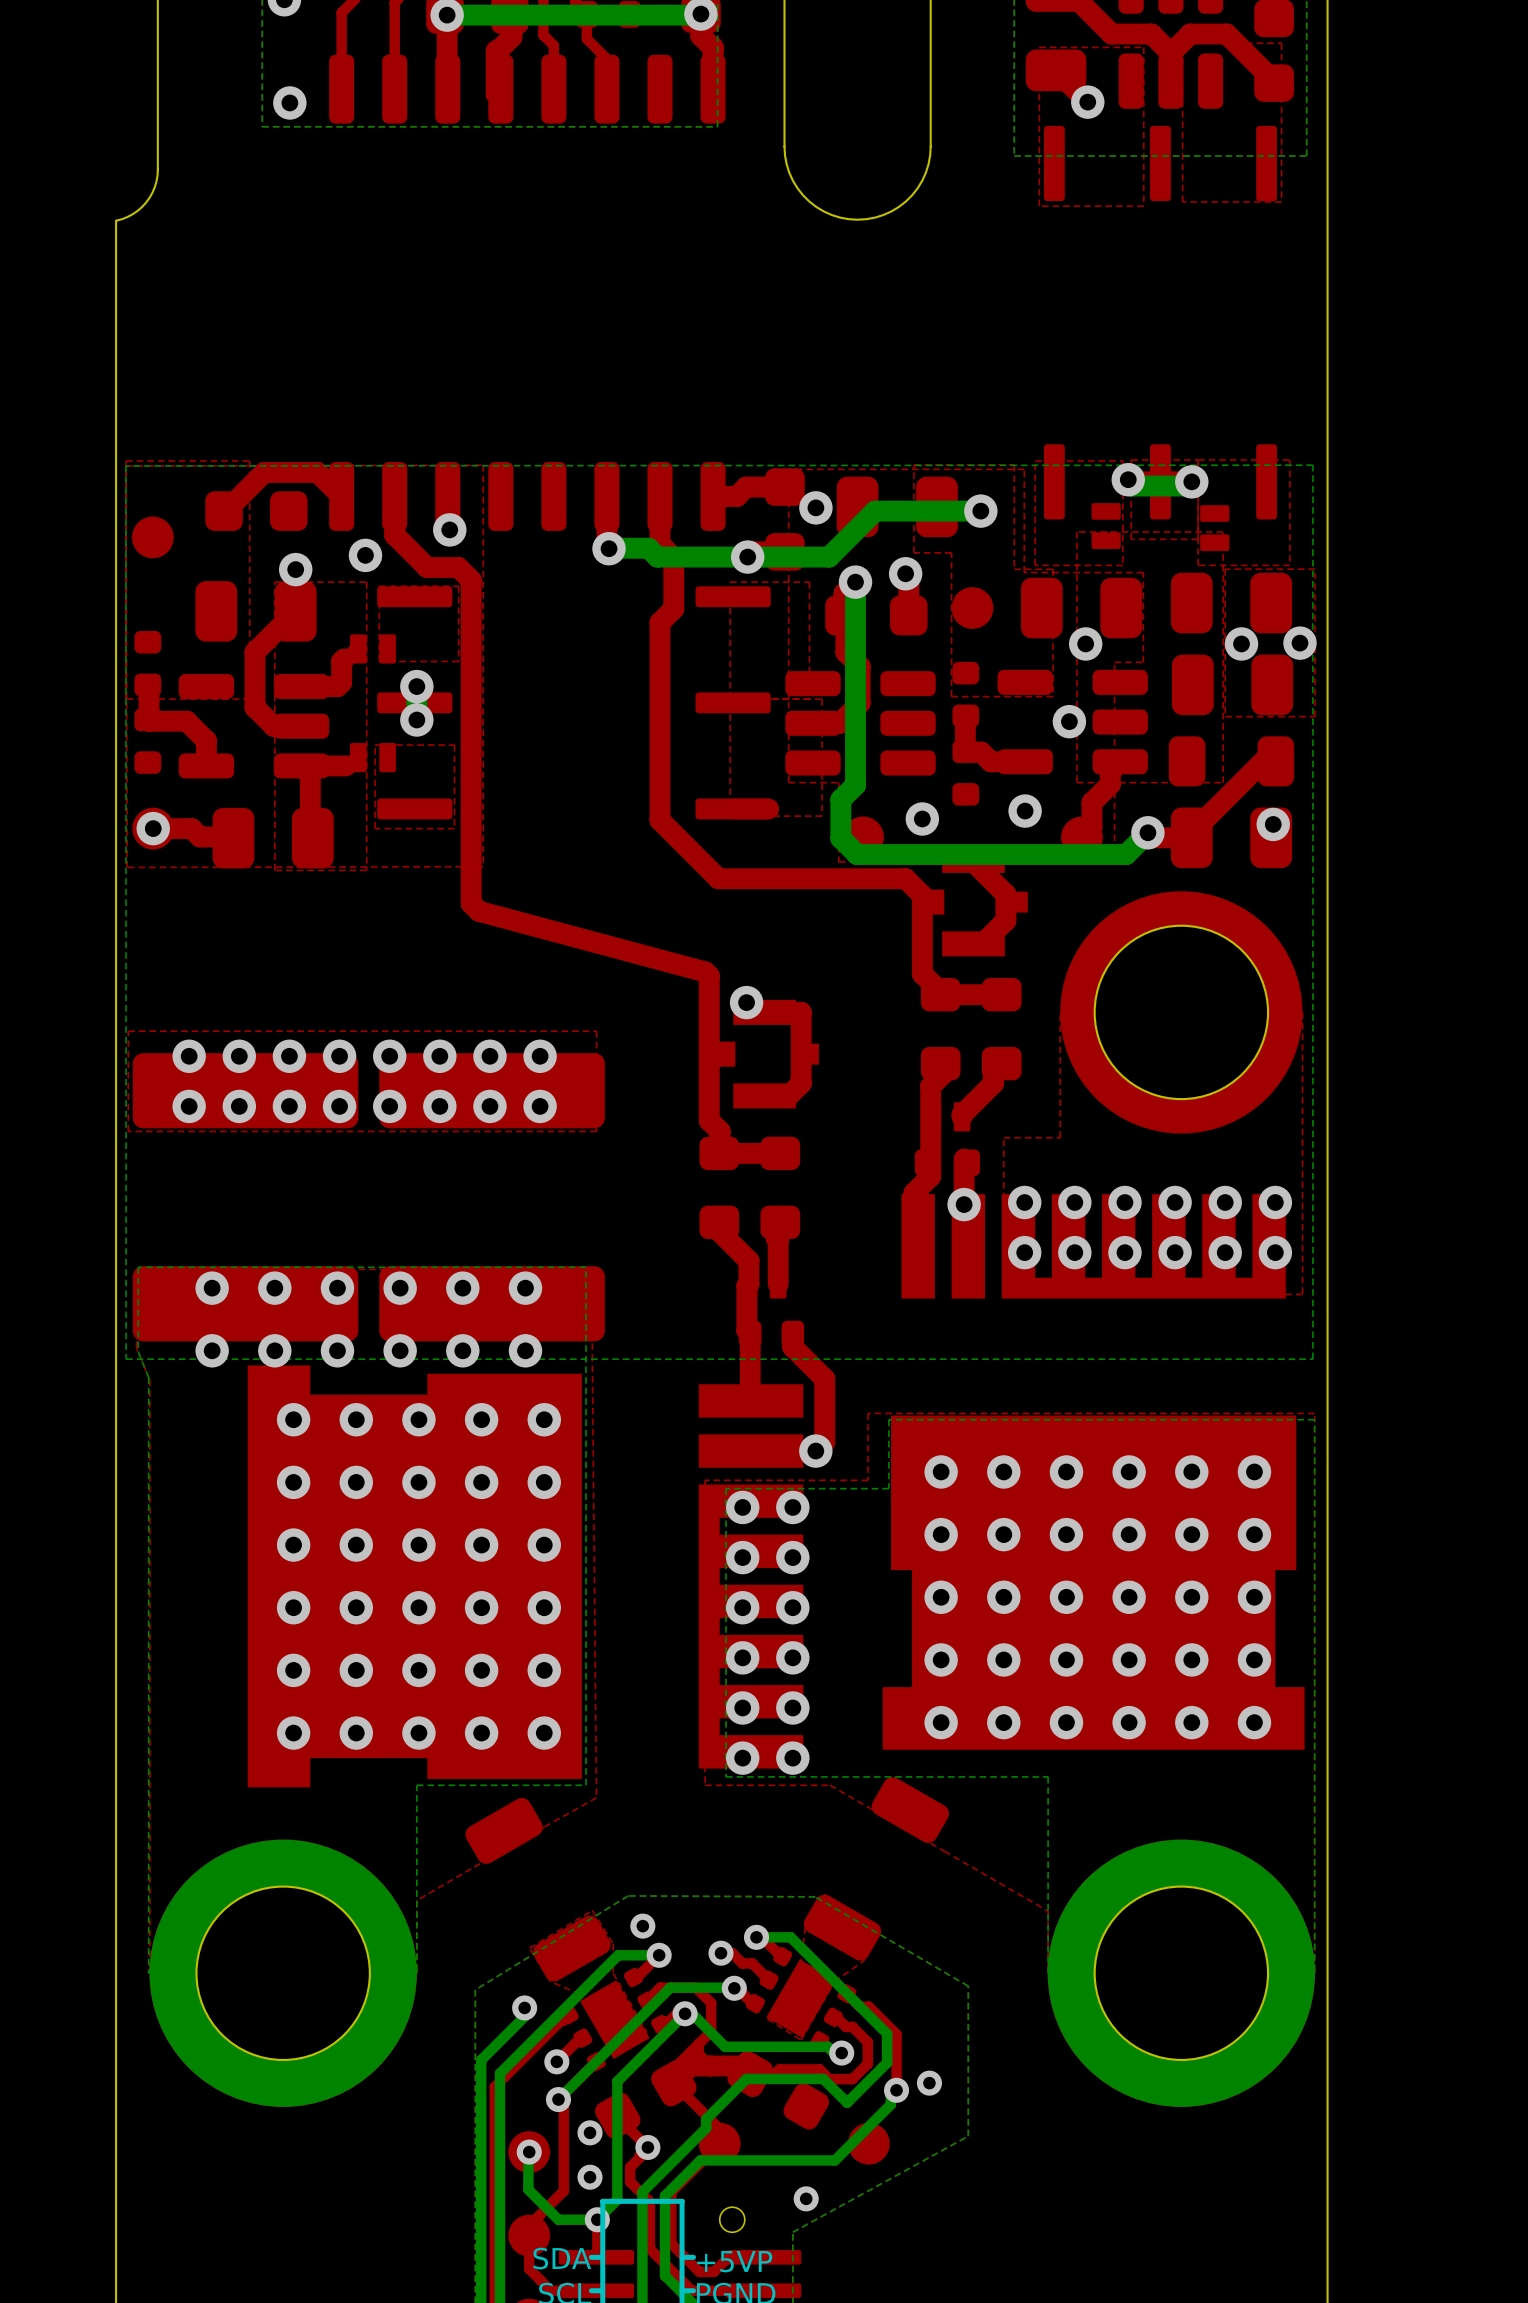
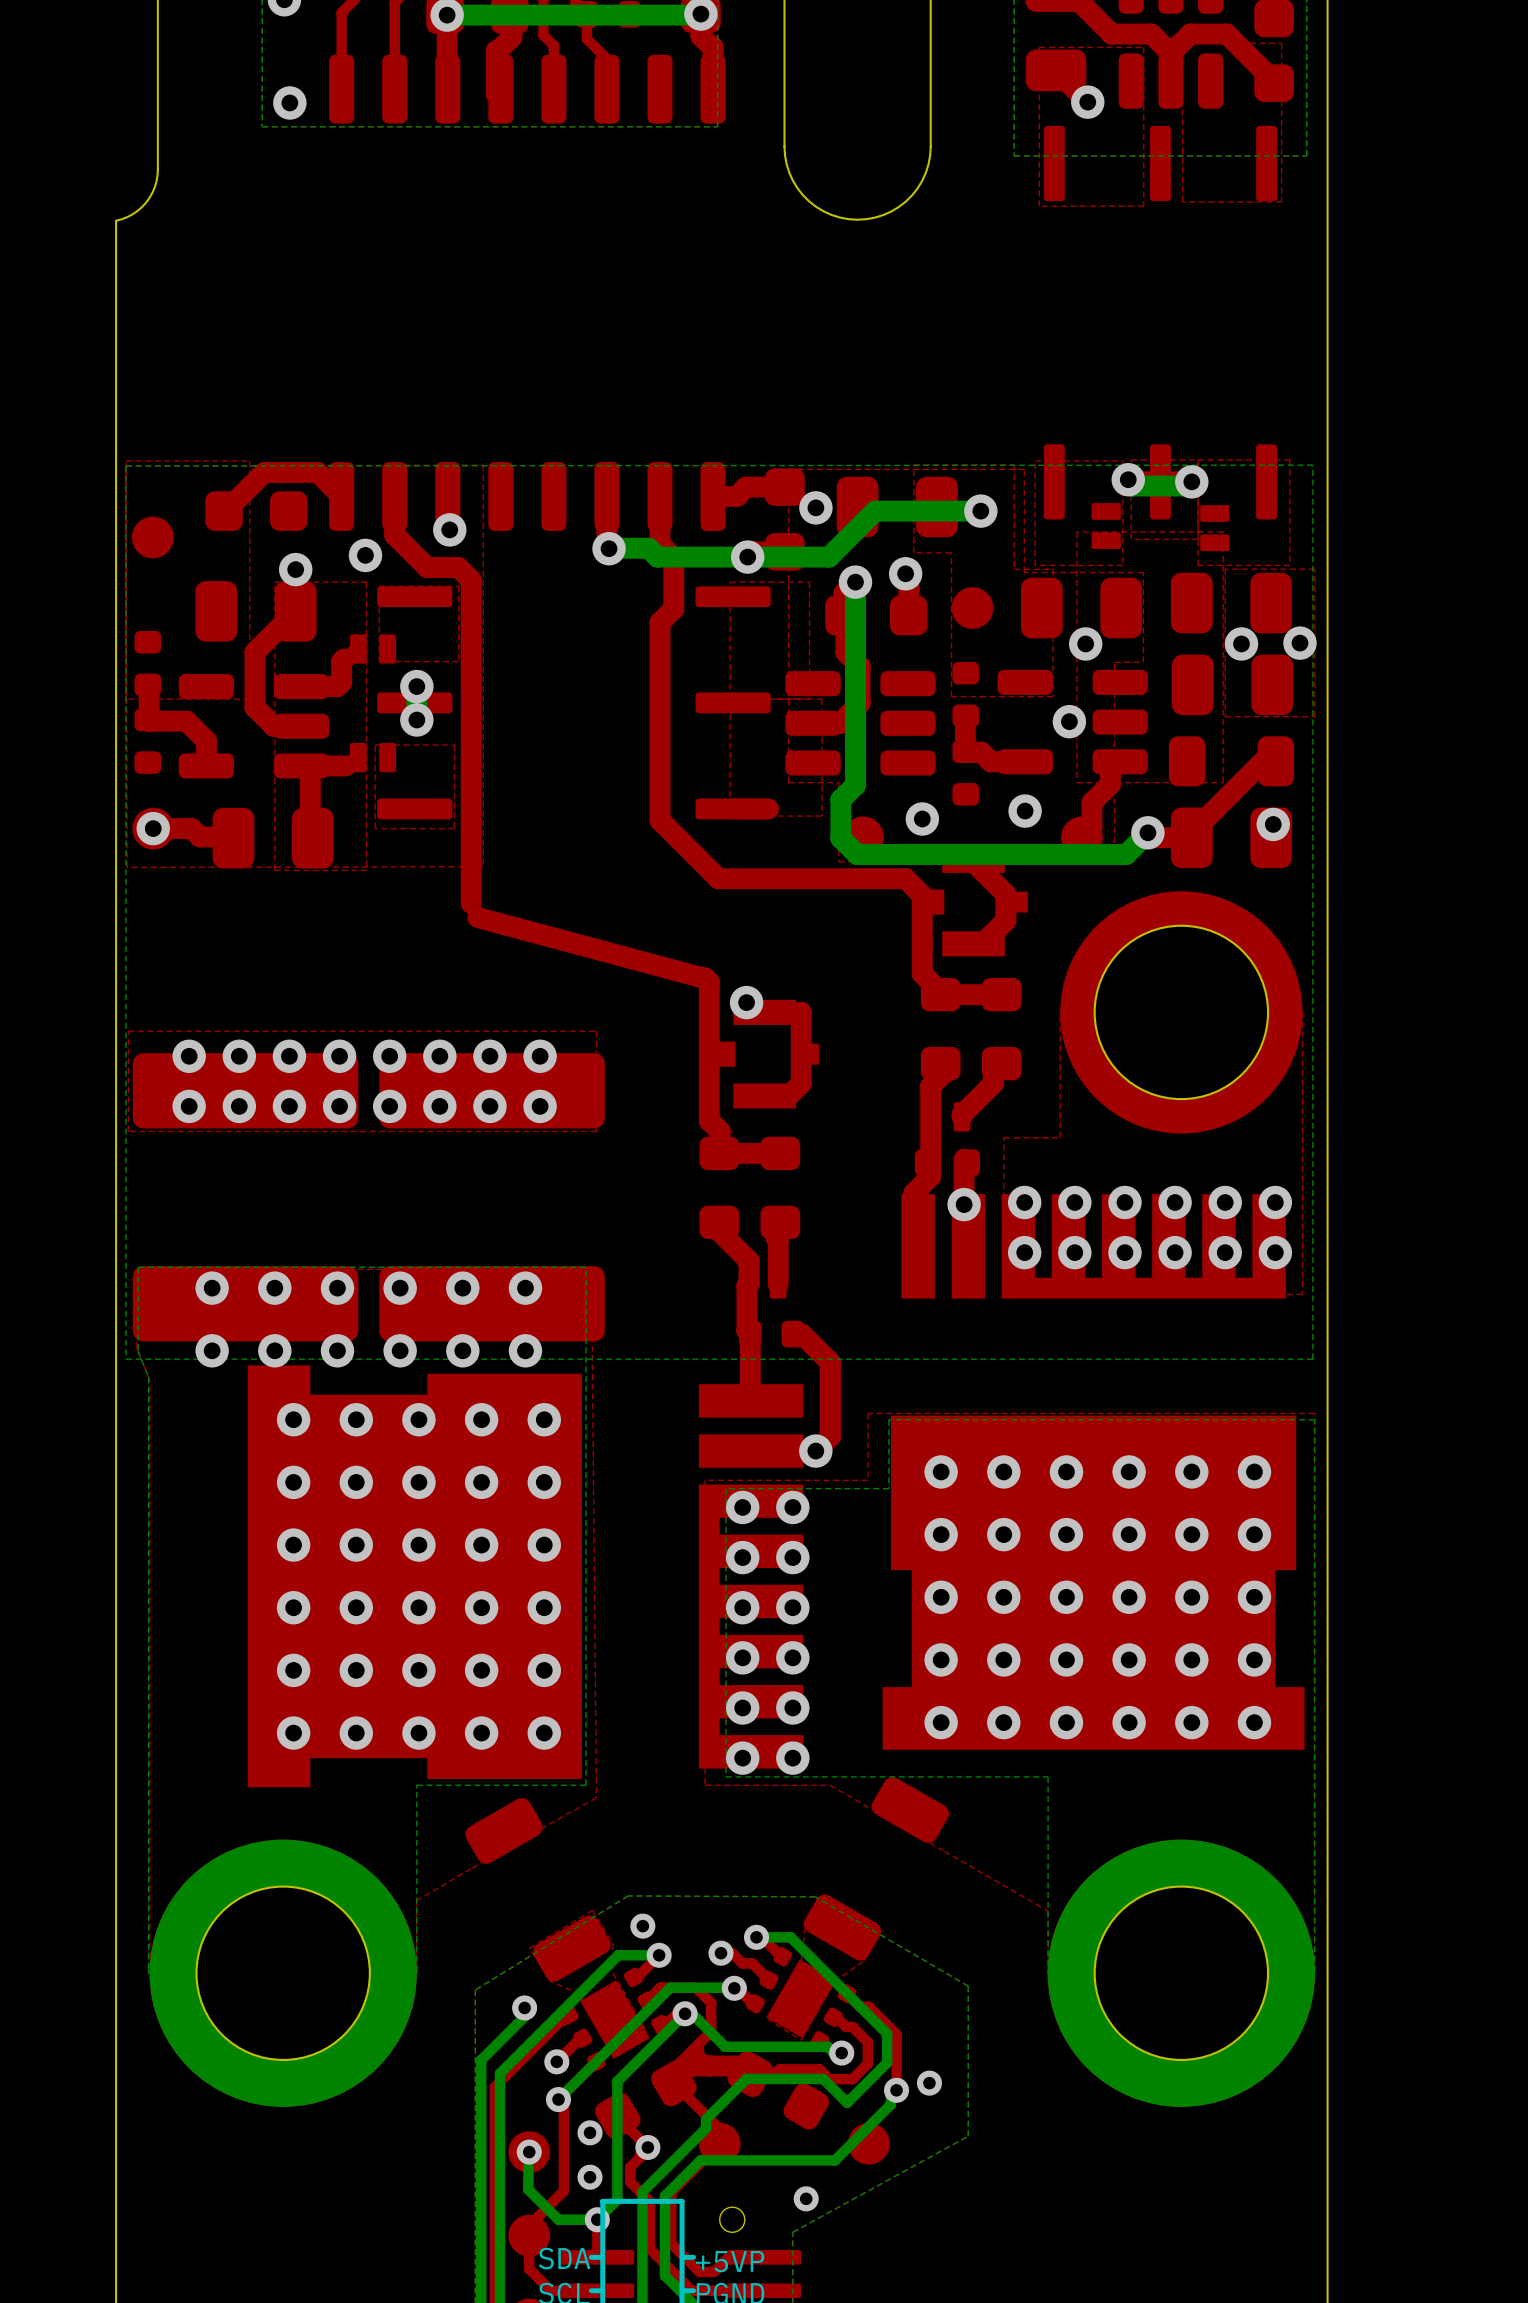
top track: (471, 903) (479, 911) (705, 971) (709, 976) (709, 982) -> (477, 917) (705, 978) (709, 982)
top track: (792, 1334) (792, 1347) (824, 1378) (824, 1442) -> (792, 1334) (801, 1334) (830, 1362) (830, 1436) (824, 1442)

